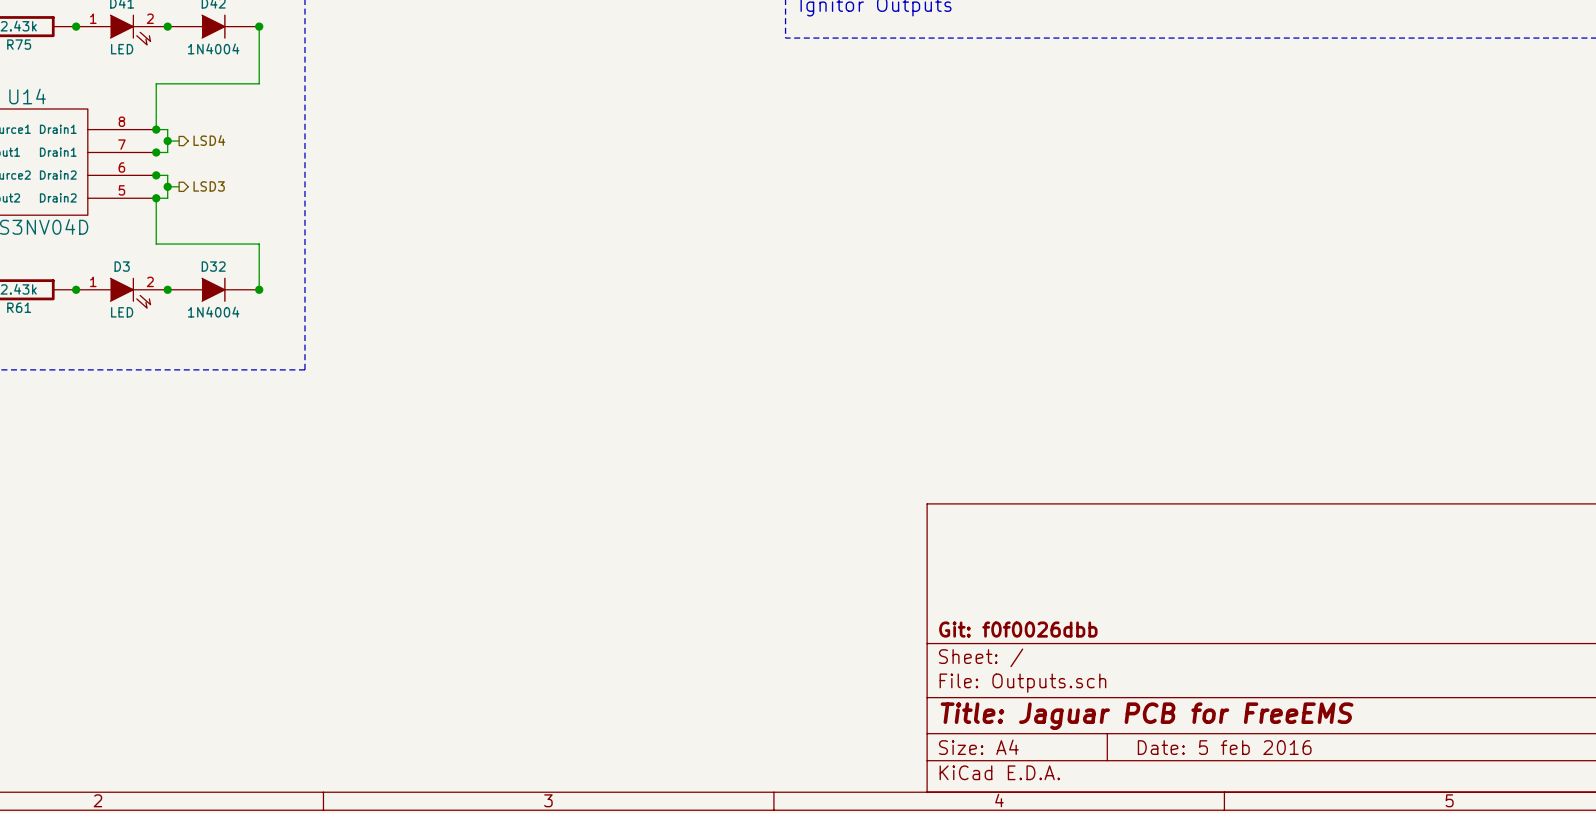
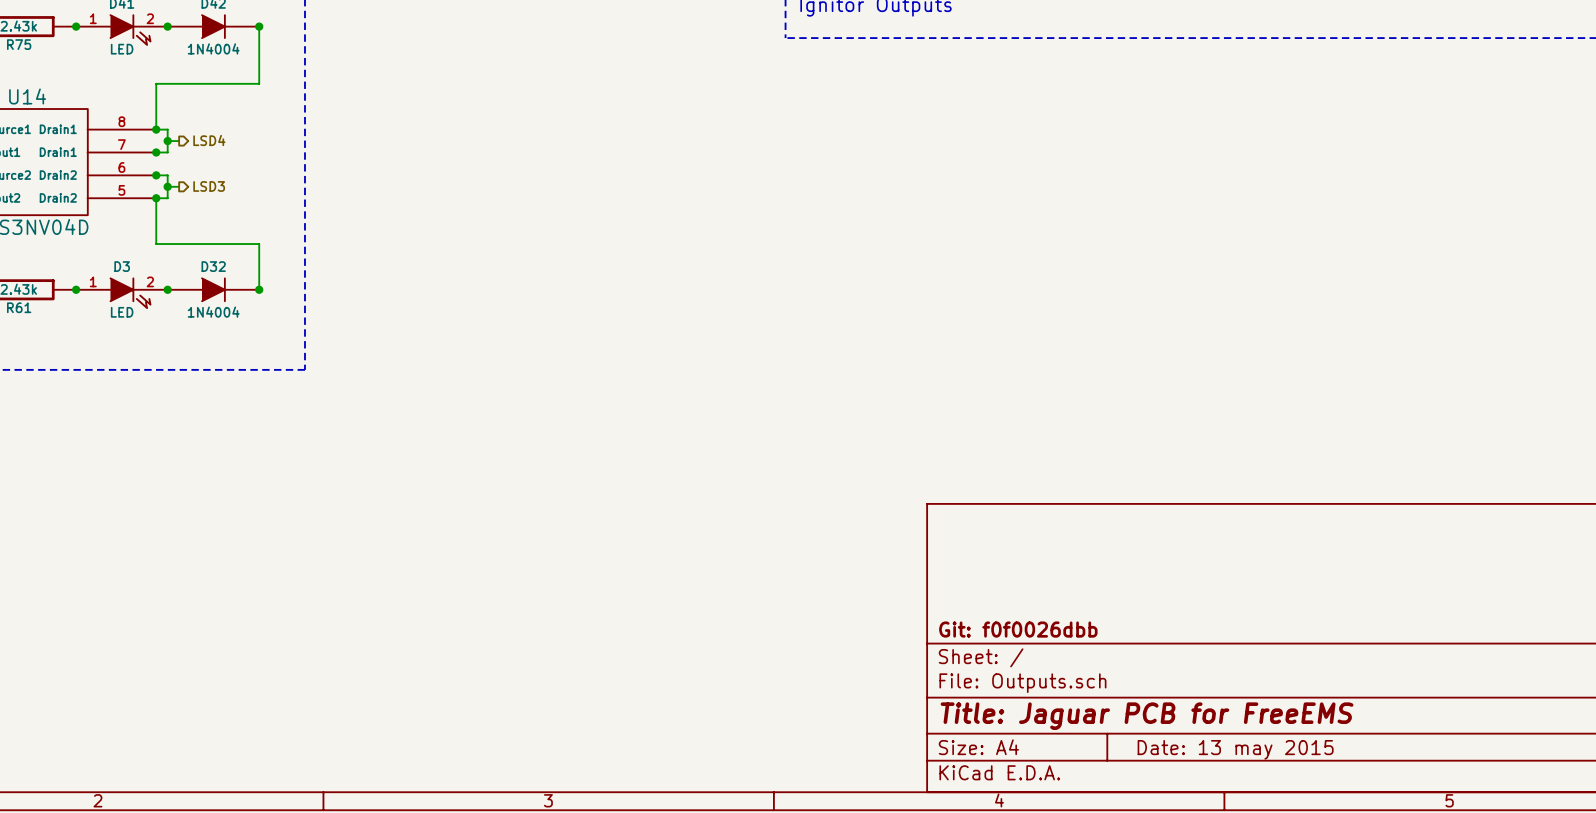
title block: Date: 5 feb 2016 (1224, 747) -> Date: 13 may 2015 (1235, 749)

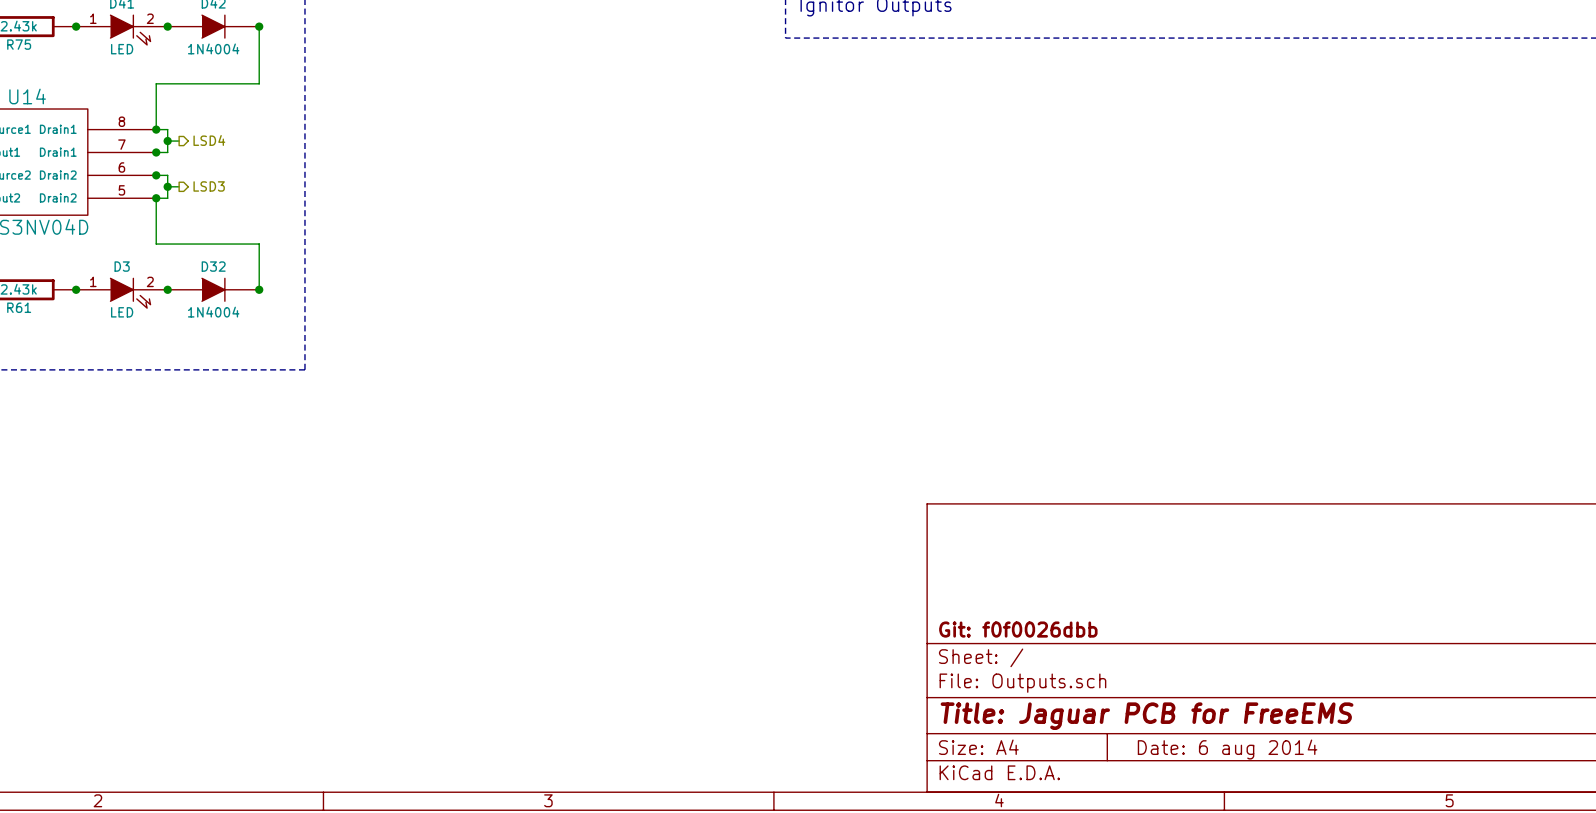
title block: Date: 13 may 2015 (1235, 749) -> Date: 6 aug 2014 (1227, 749)

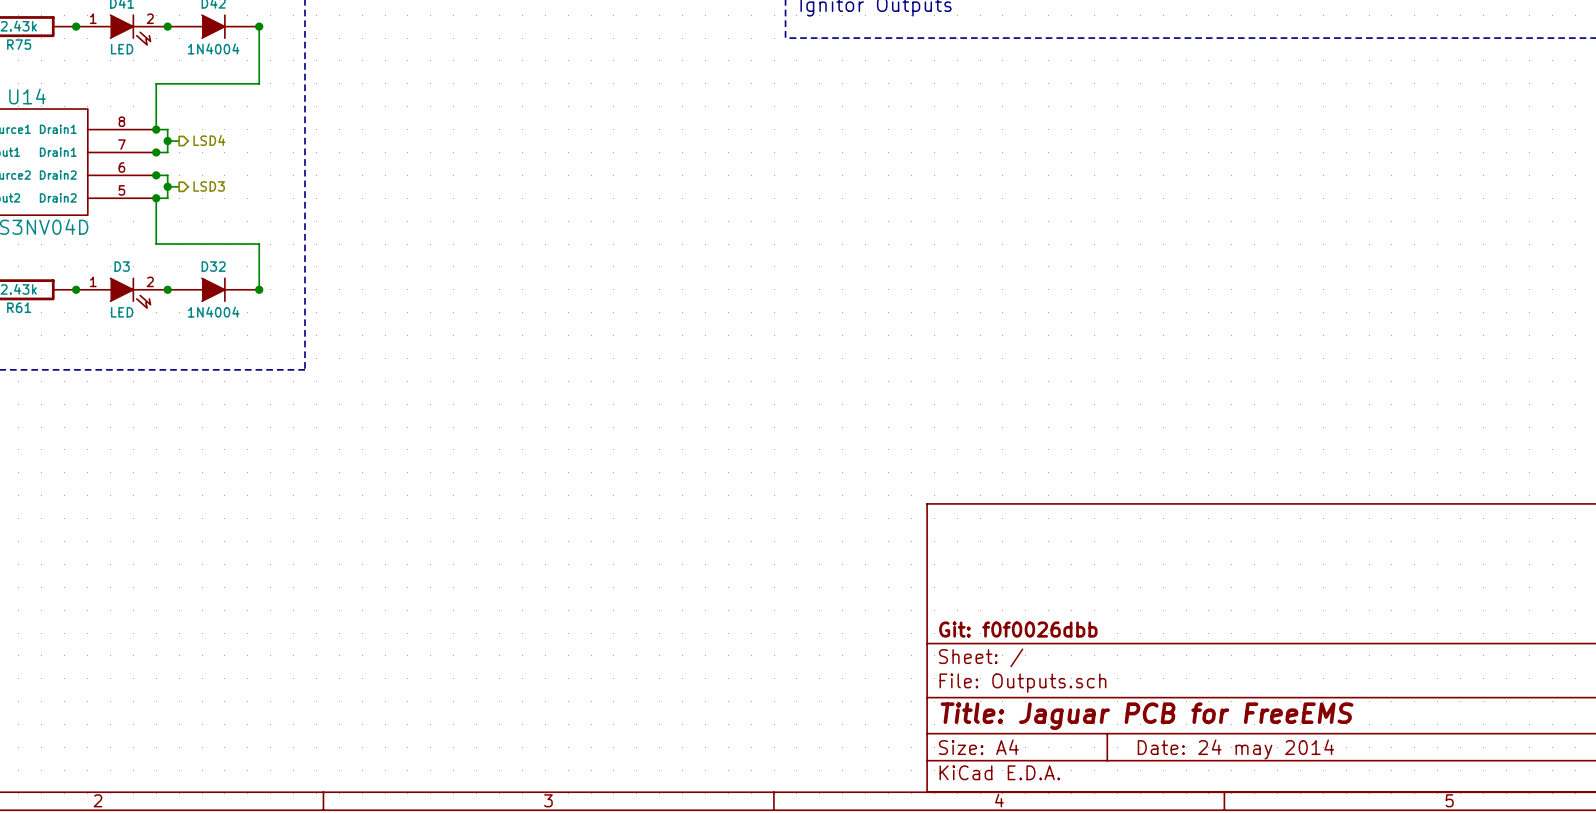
title block: Date: 6 aug 2014 (1227, 749) -> Date: 24 may 2014 (1235, 749)

